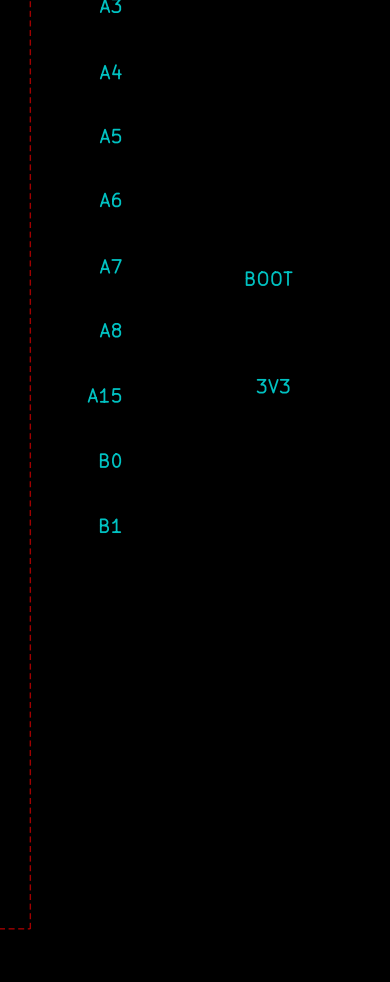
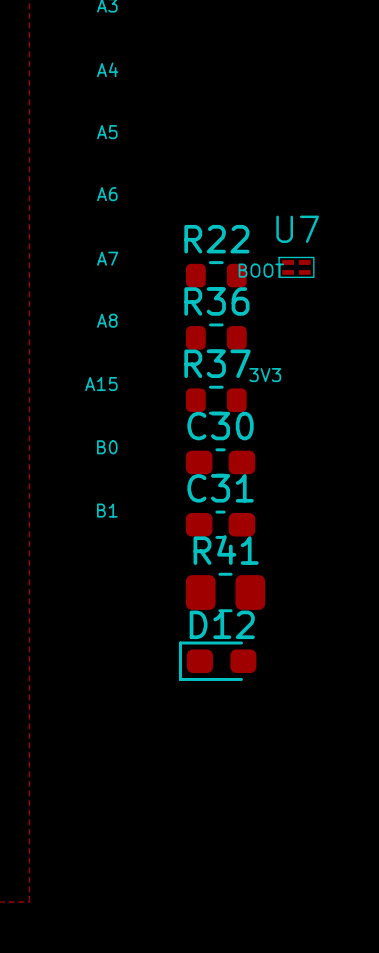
U7: none -> (296, 267)
R22: none -> (216, 275)
R36: none -> (216, 337)
R37: none -> (216, 400)
C30: none -> (220, 462)
C31: none -> (220, 524)
R41: none -> (225, 592)
D12: none -> (217, 661)

